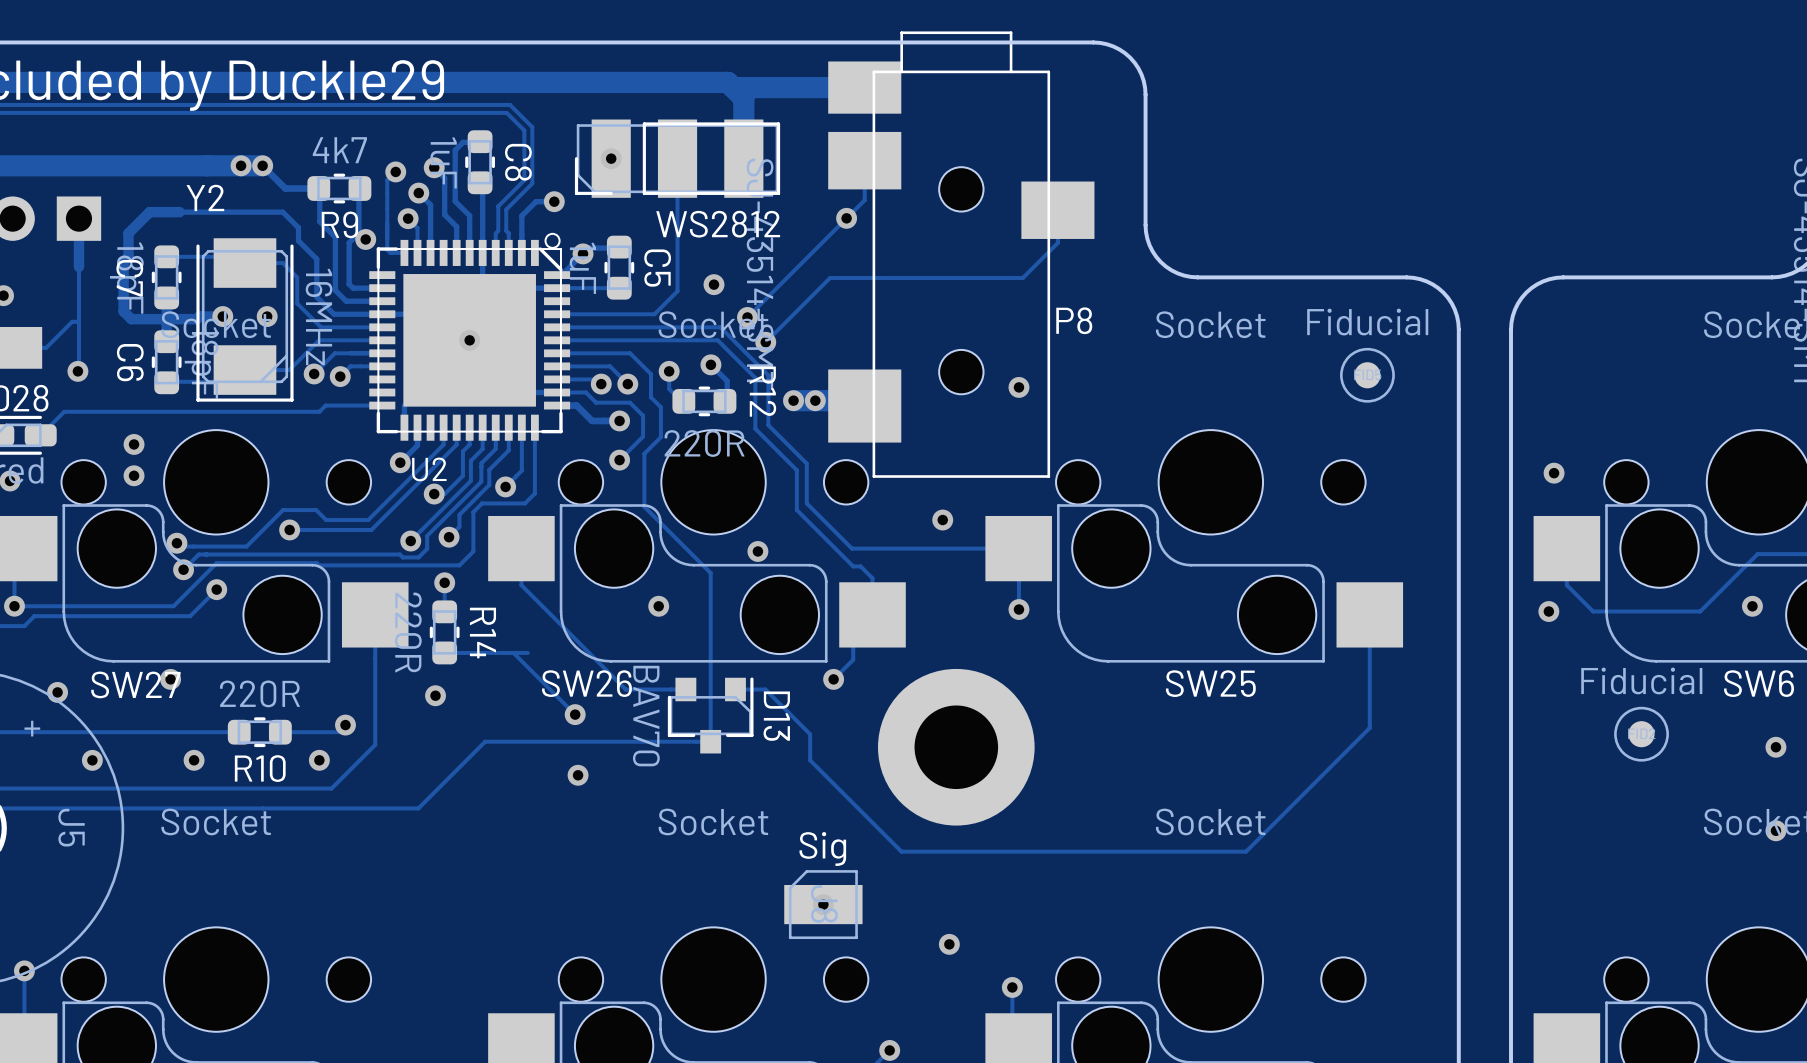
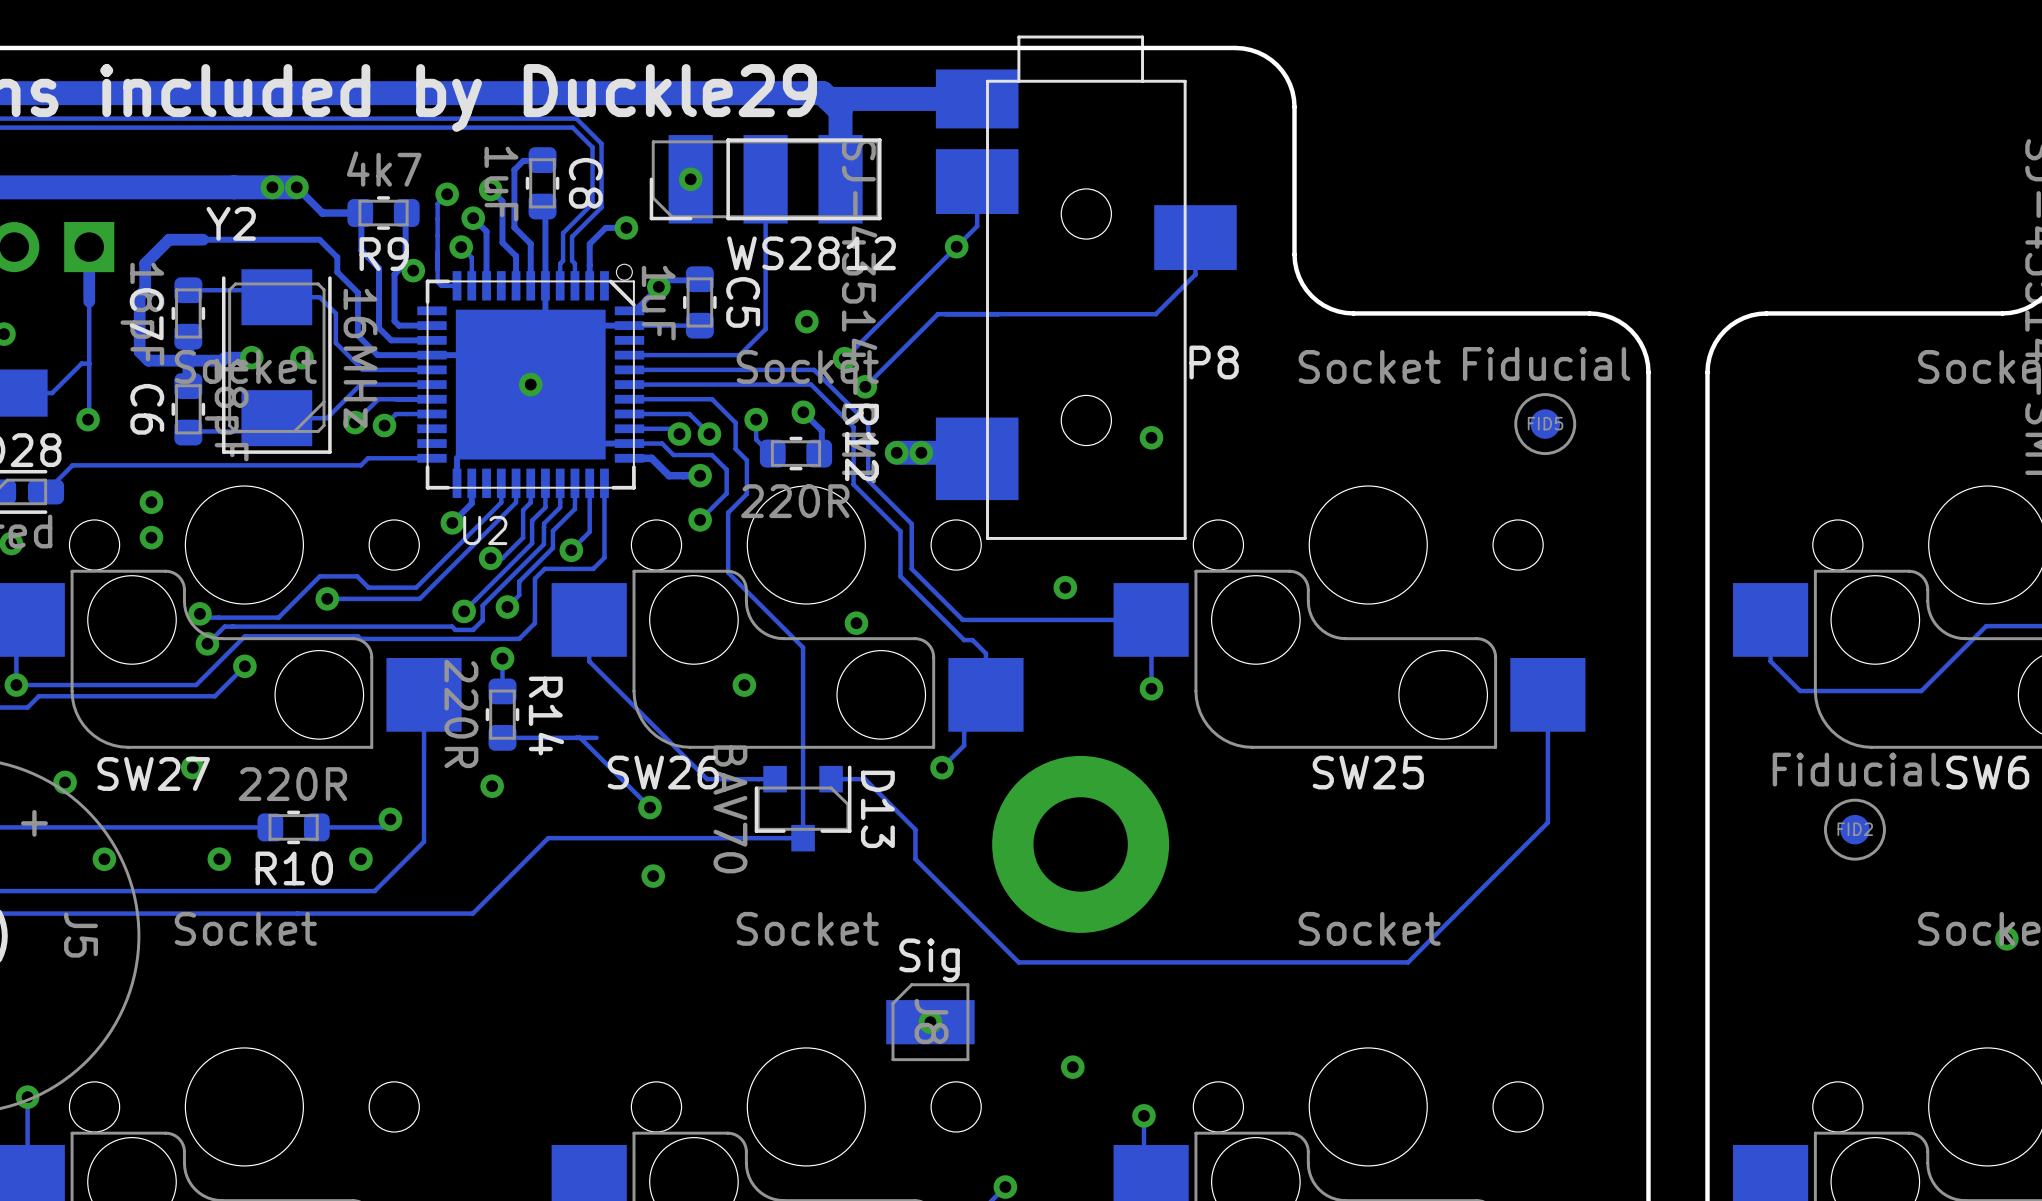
via: (1554, 473) -> none
via: (1752, 606) -> none
via: (1548, 611) -> none
via: (1775, 747) -> none

